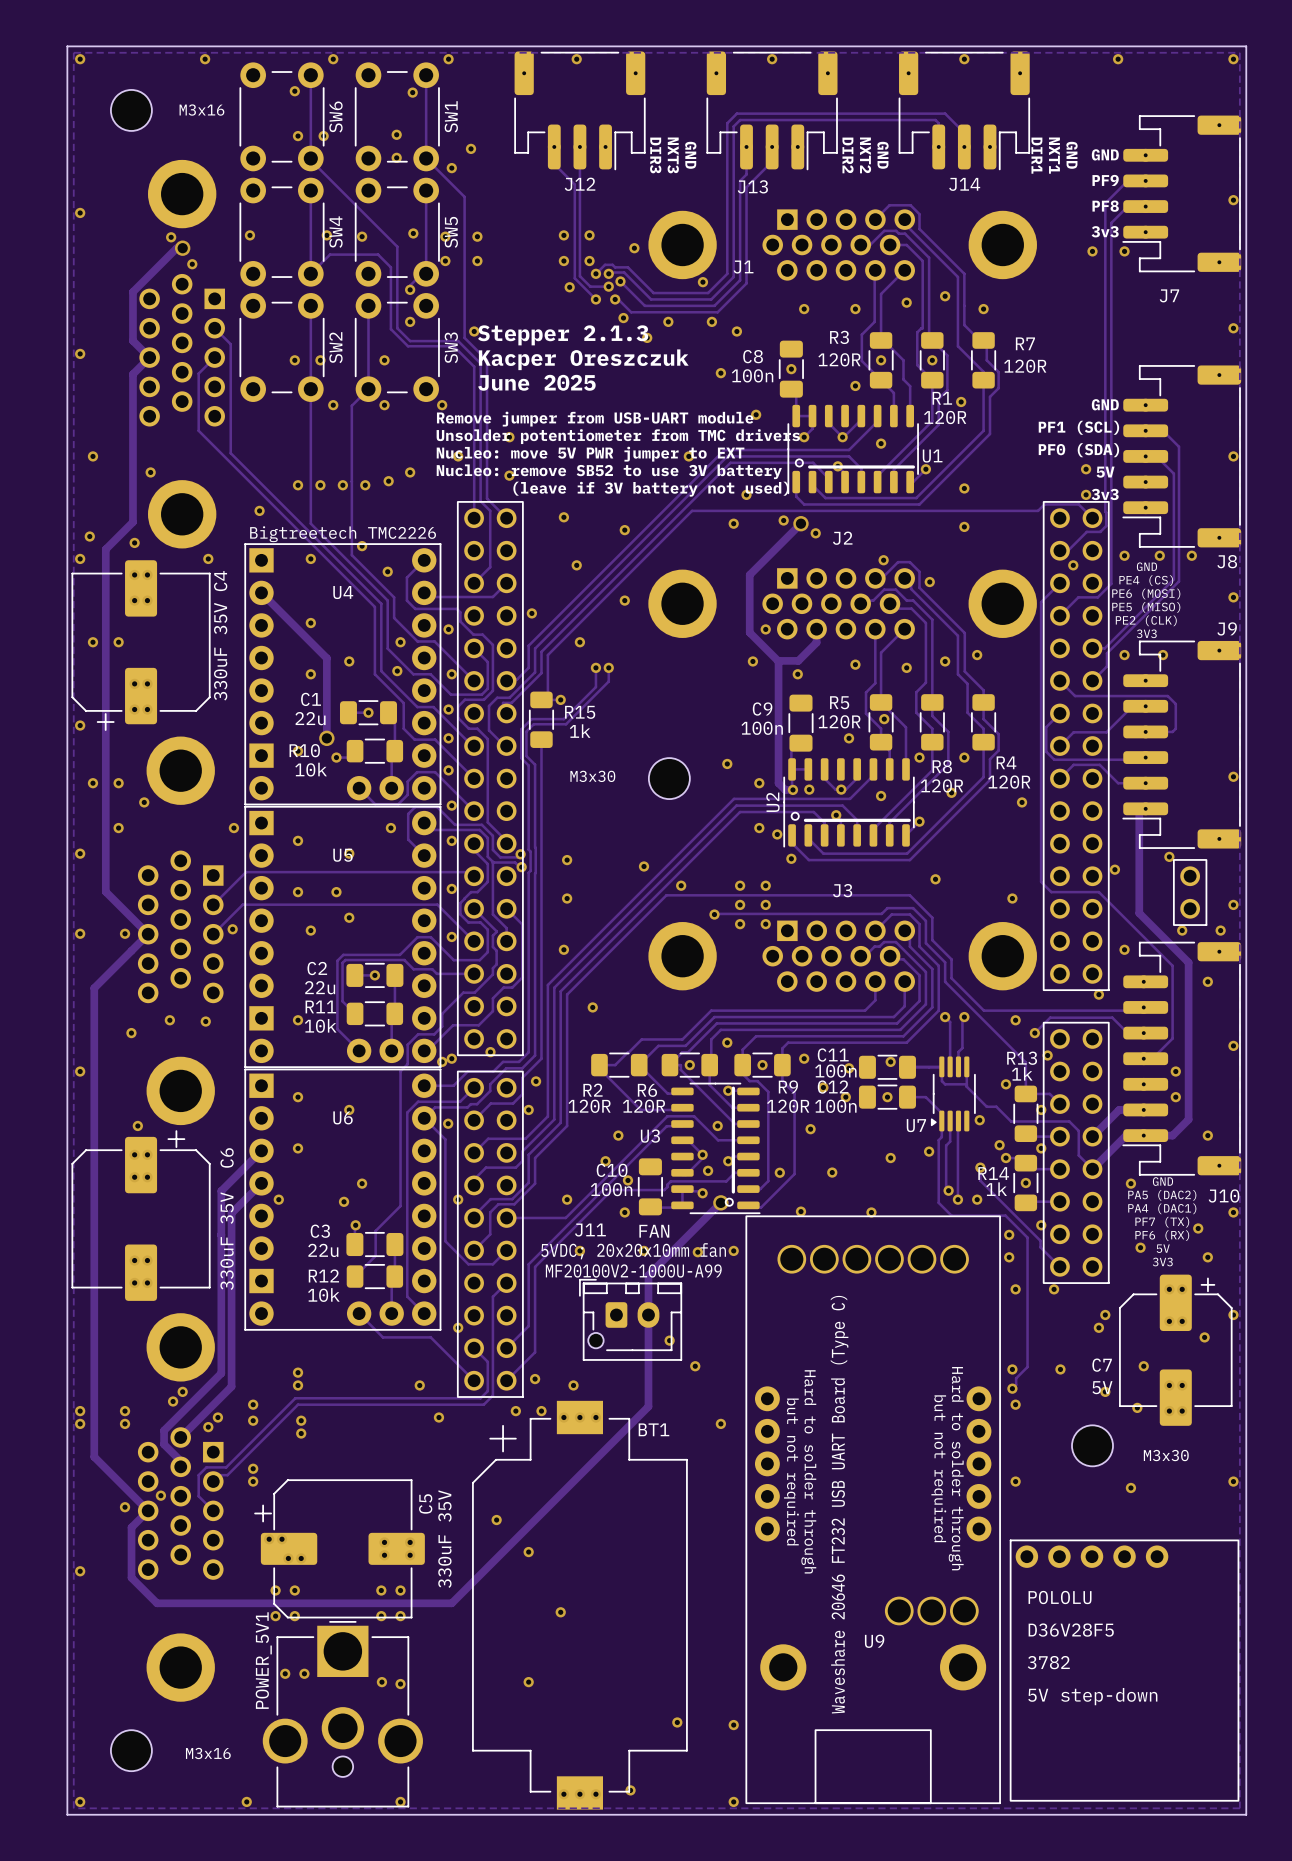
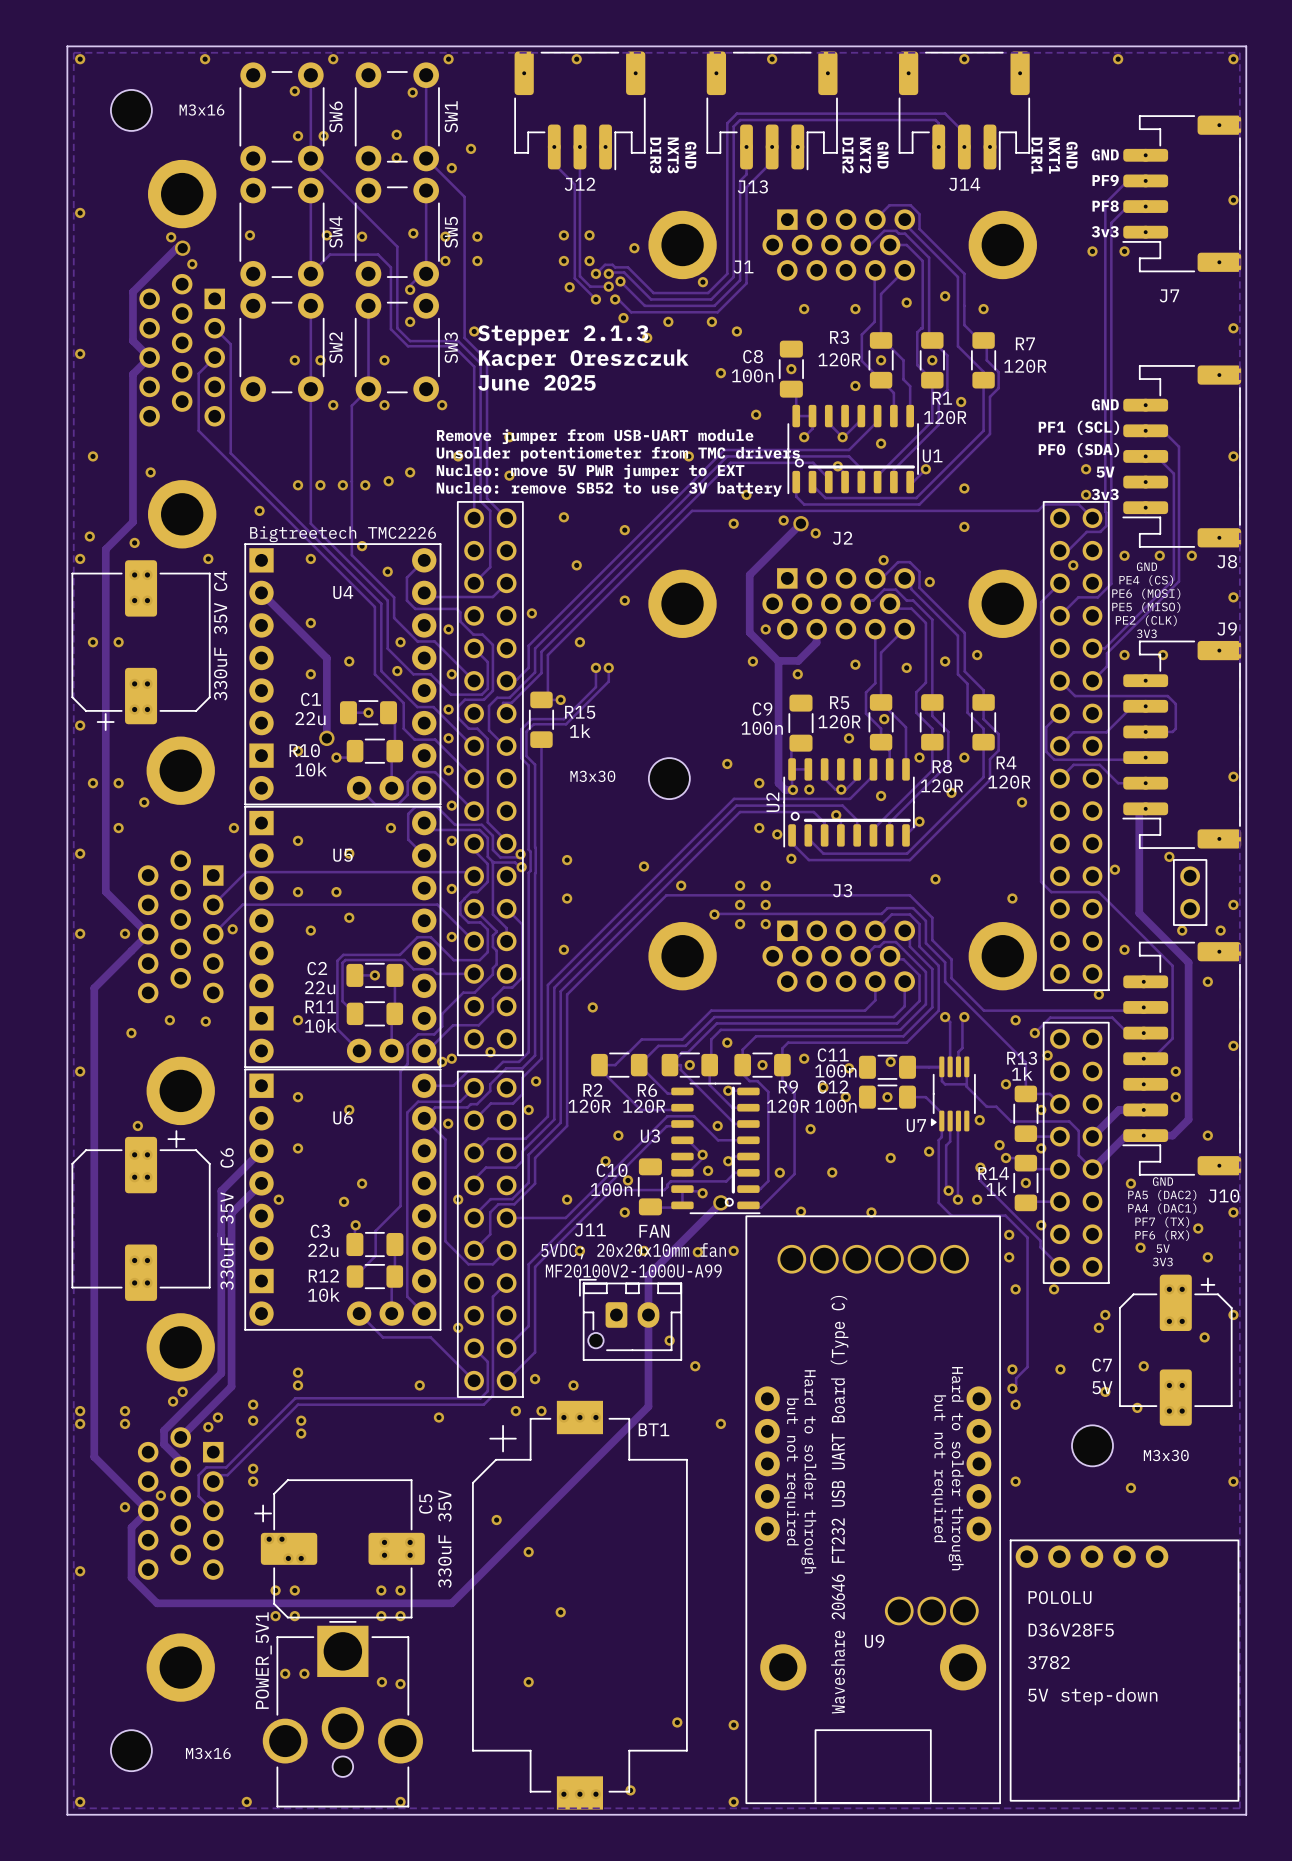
text: Remove jumper from USB-UART module (595, 419) -> none
text: Unsolder potentiometer from TMC drivers (618, 436) -> Remove jumper from USB-UART module (595, 436)
text: Nucleo: move 5V PWR jumper to EXT (590, 454) -> Unsolder potentiometer from TMC drivers (618, 454)
text: Nucleo: remove SB52 to use 3V battery (609, 471) -> Nucleo: move 5V PWR jumper to EXT (590, 471)
text: (leave if 3V battery not used) (651, 489) -> Nucleo: remove SB52 to use 3V battery (609, 489)

